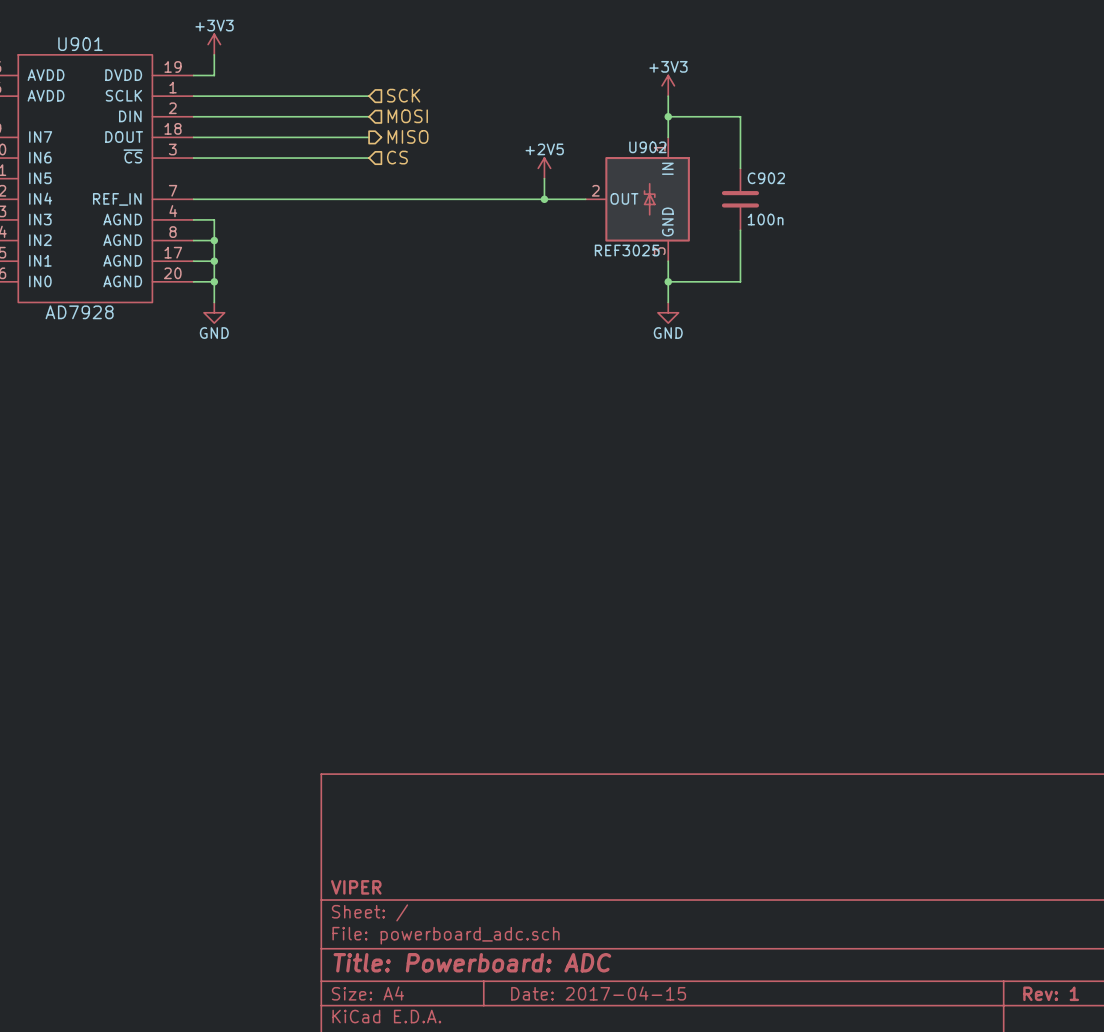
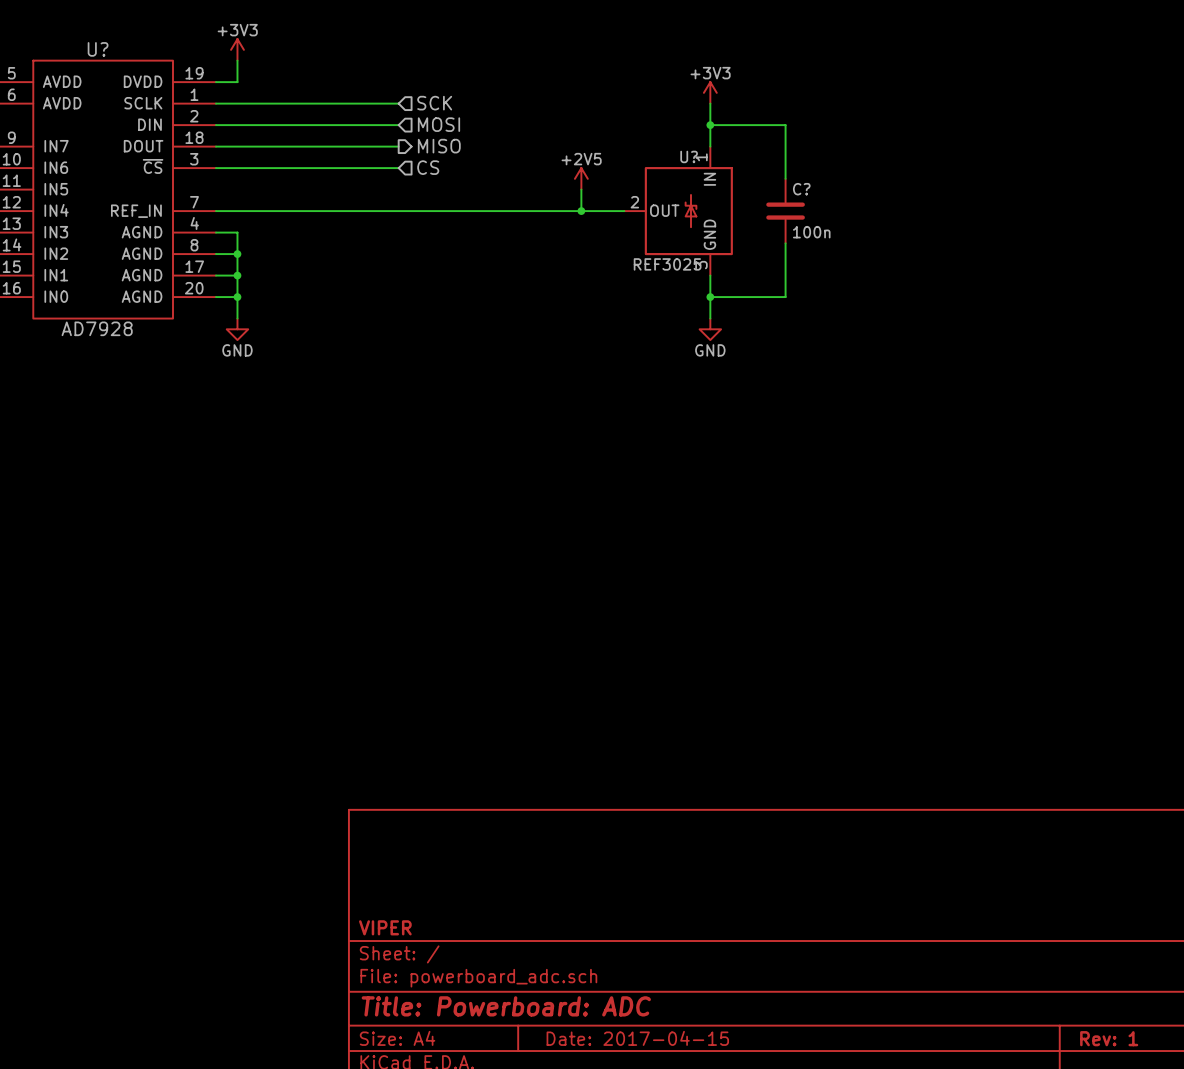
U901 name: U901 (80, 44) -> U? (98, 49)
U902 name: U902 (647, 147) -> U? (689, 156)
C902 name: C902 (766, 178) -> C? (801, 189)

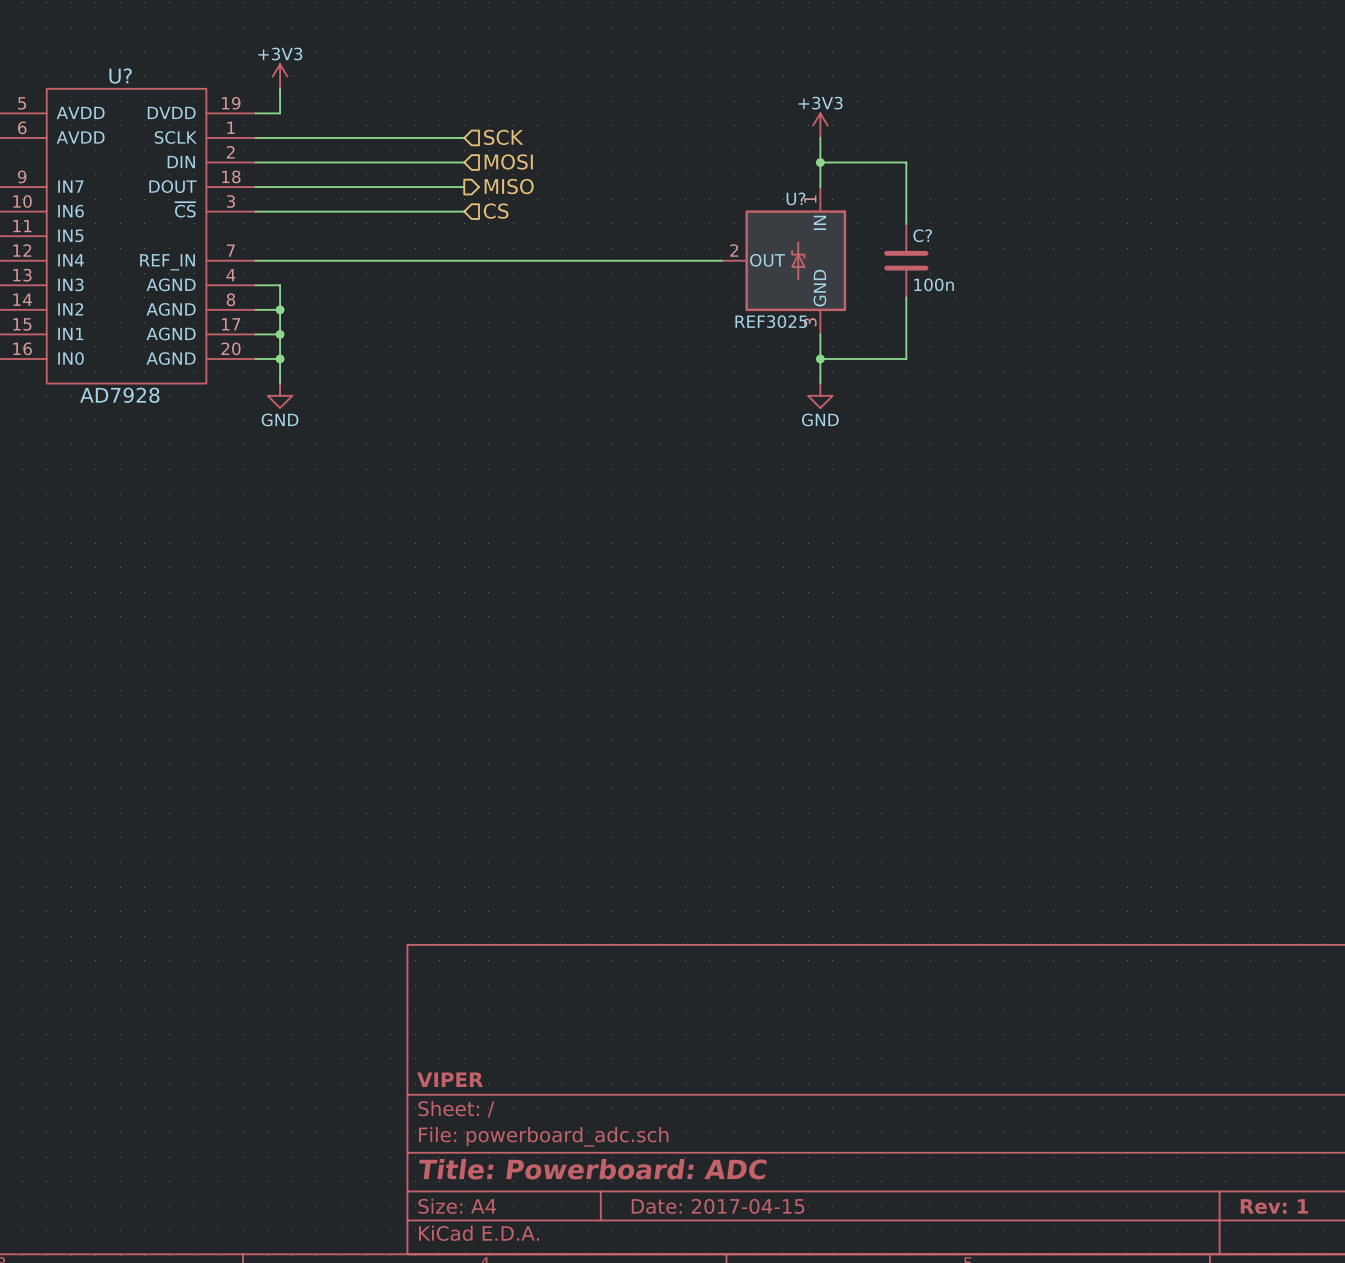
power symbol: +2V5 (581, 178) -> none
wire: (581, 189) (581, 211) -> none
junction: (581, 211) -> none

